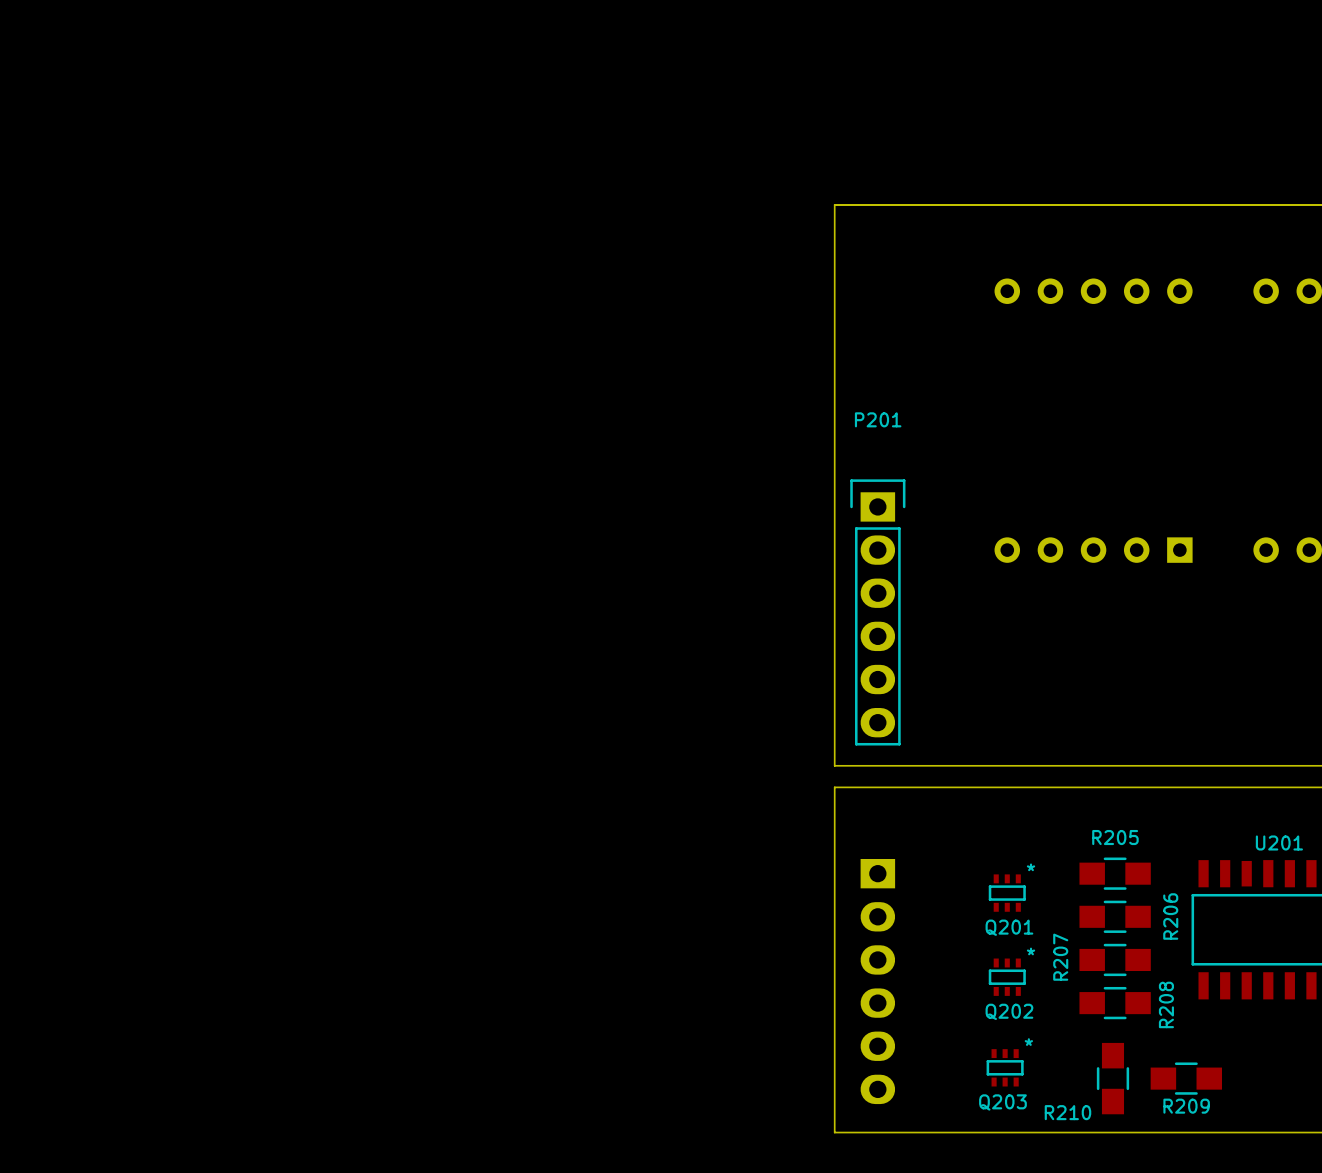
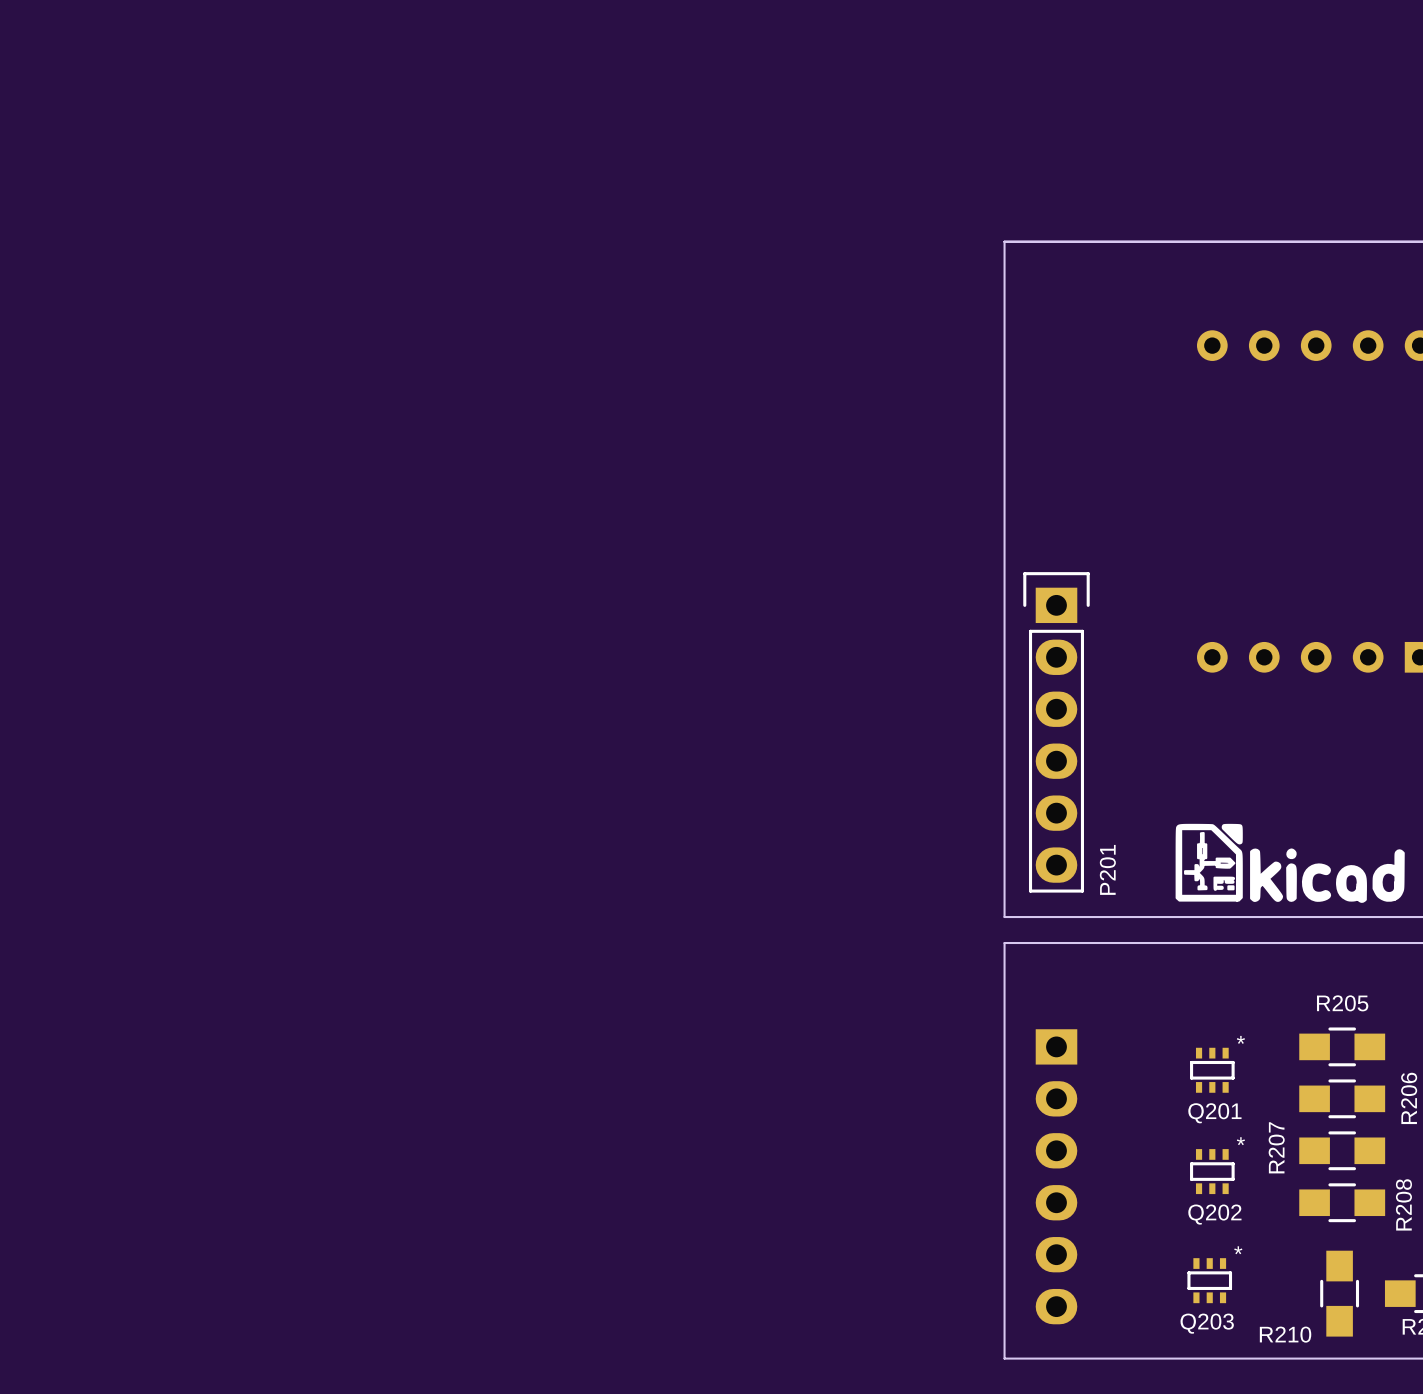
P201 name rotation: 0° (878, 419) -> 90° counterclockwise (1107, 869)
P201 name position: P201 (878, 419) -> P201 (1107, 869)
drawing: none -> [1175, 823, 1405, 903]

